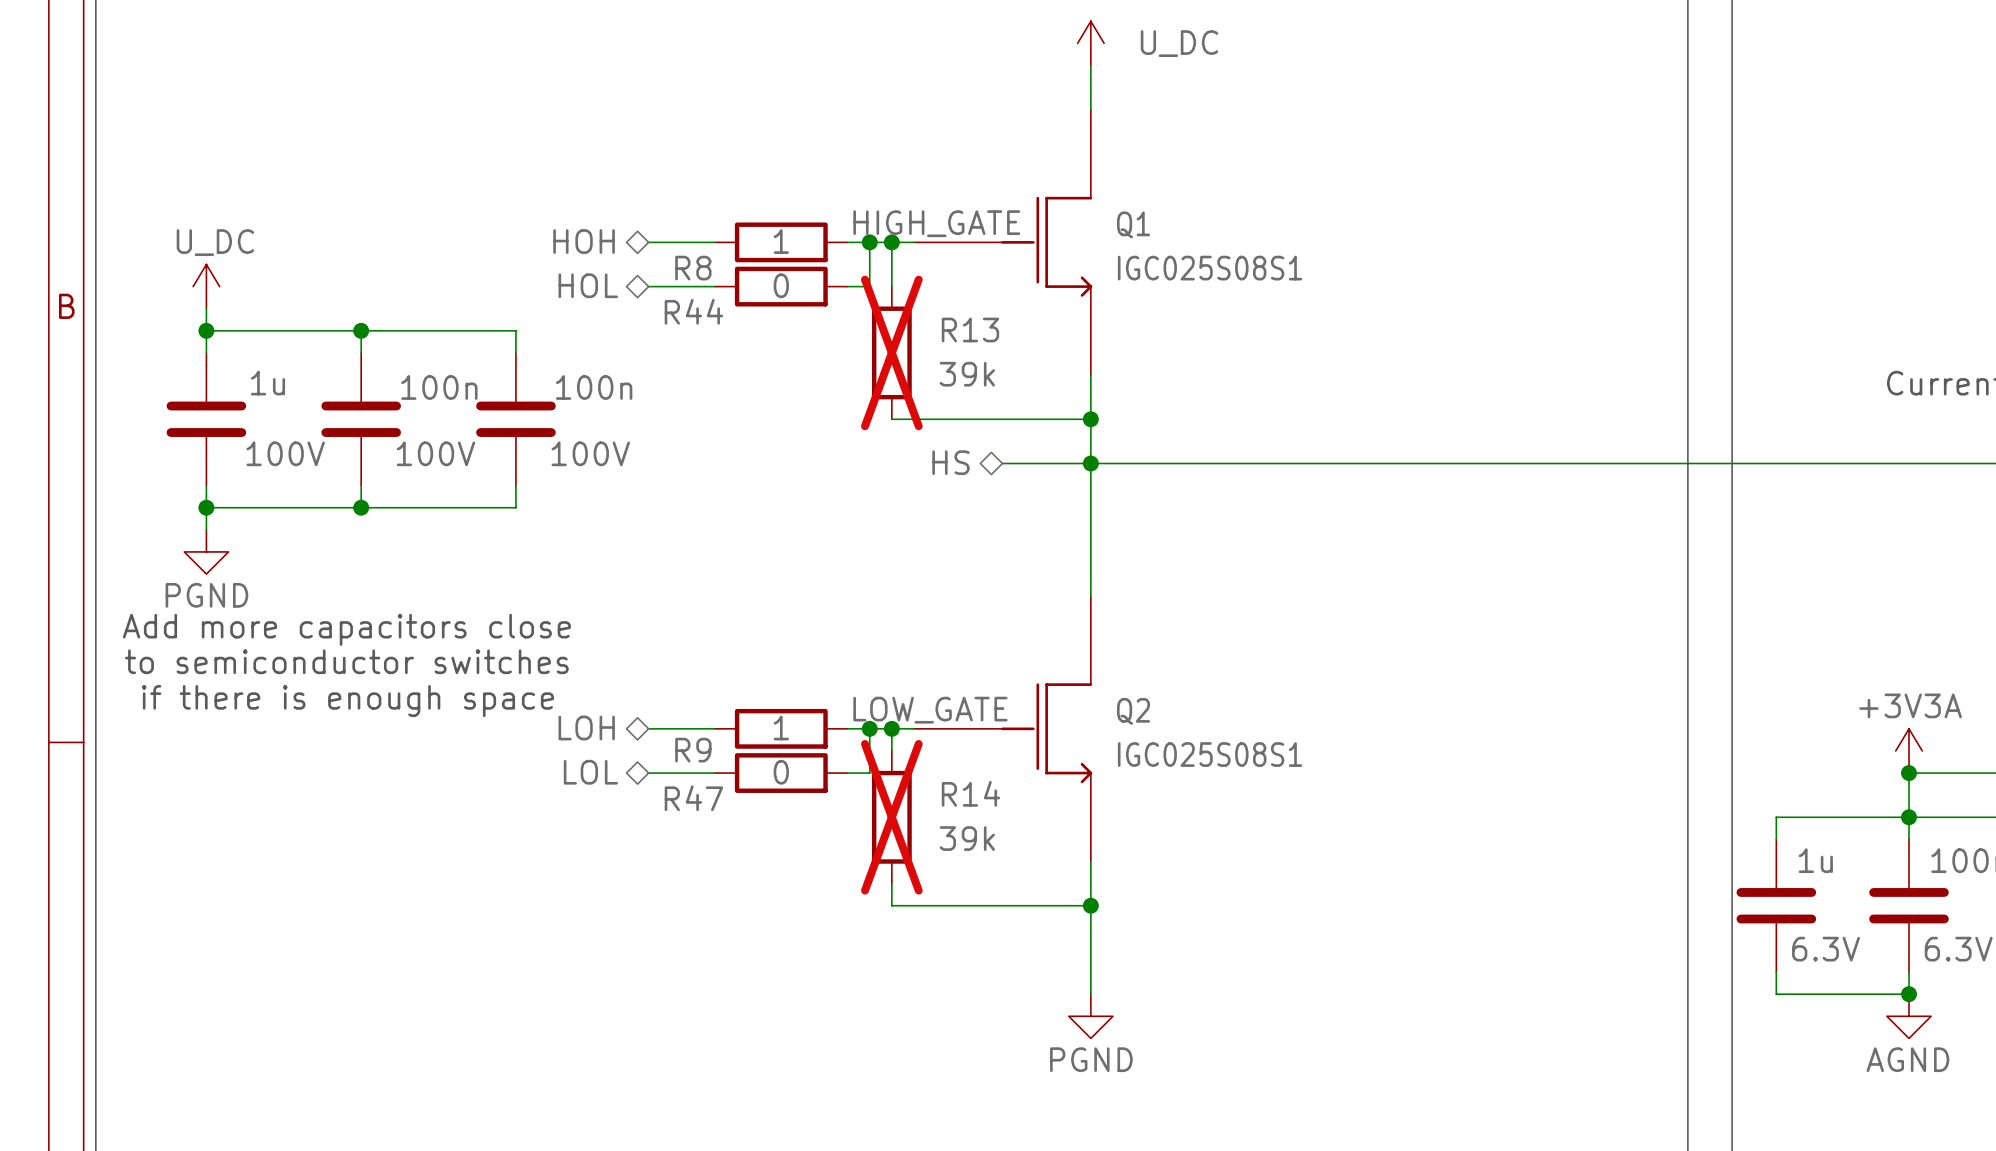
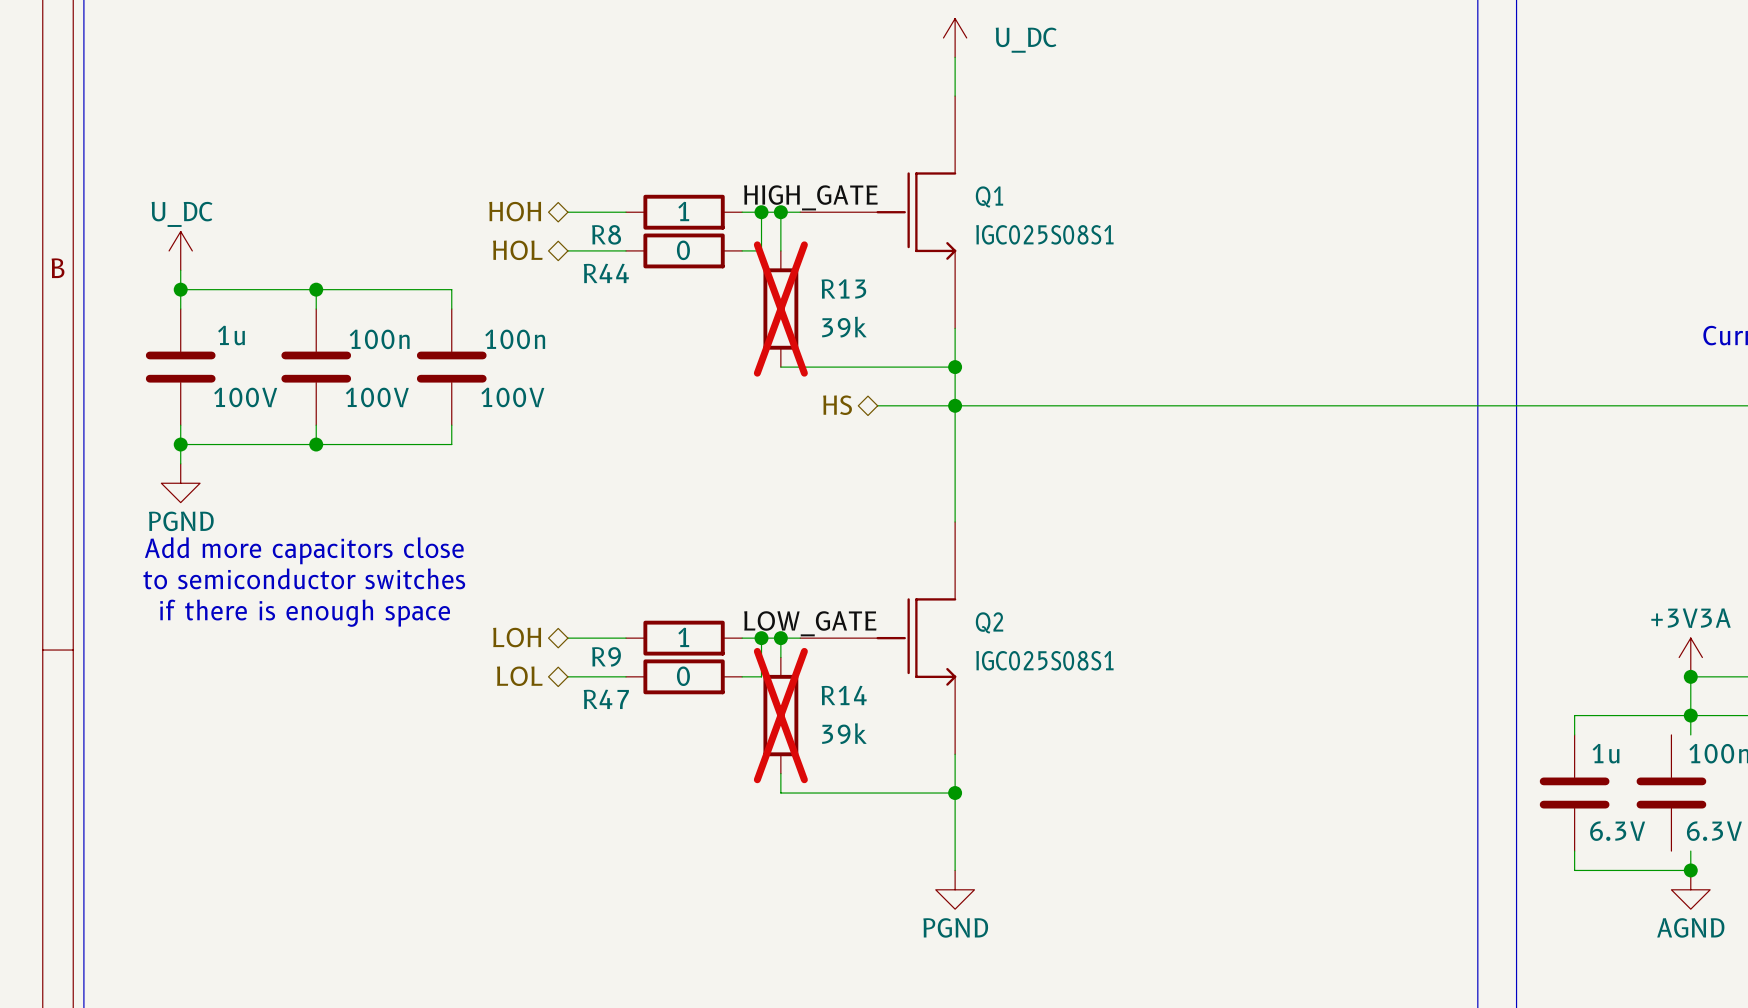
power symbol position: +3V3A (1909, 750) -> +3V3A (1690, 657)
junction position: (1909, 773) -> (1690, 676)
wire: (1931, 773) (1909, 773) (1909, 839) -> (1690, 676) (1690, 734)
wire: (1798, 817) (1776, 817) (1776, 839) -> (1574, 715) (1574, 734)
junction position: (1909, 817) -> (1690, 715)
part position: (1776, 905) -> (1574, 793)
wire: (1776, 972) (1776, 994) (1798, 994) -> (1574, 851) (1574, 870)
wire: (1909, 972) (1909, 994) -> (1690, 851) (1690, 870) (1671, 870)
junction position: (1909, 994) -> (1690, 870)
power symbol position: AGND (1909, 1016) -> AGND (1690, 889)

